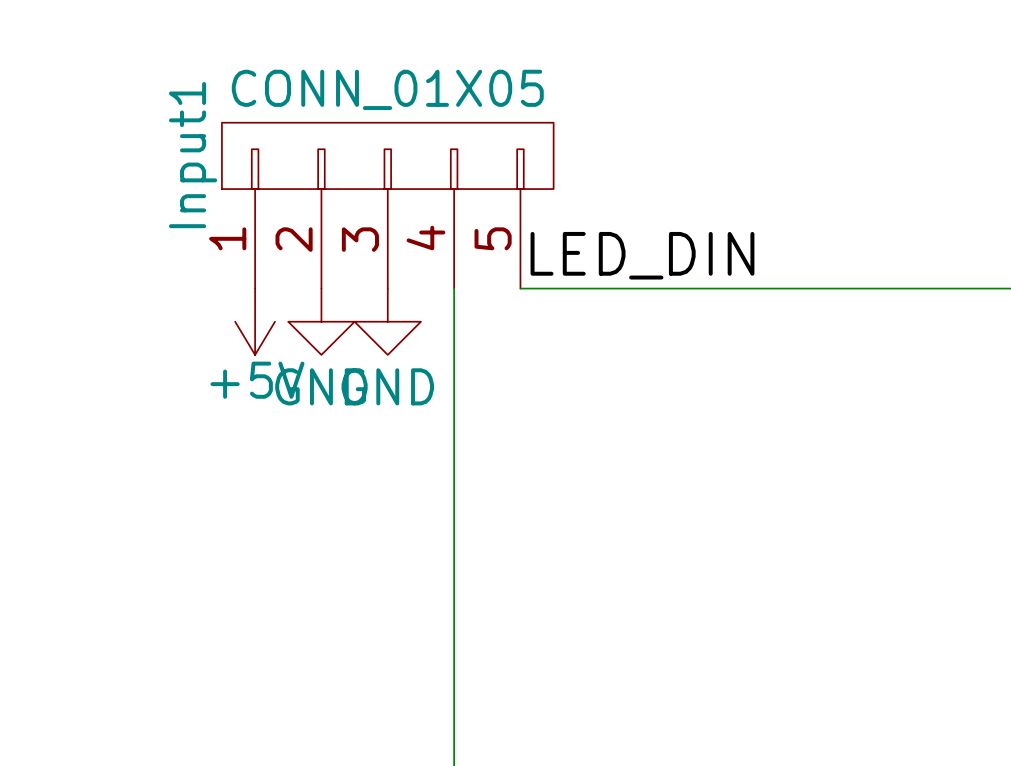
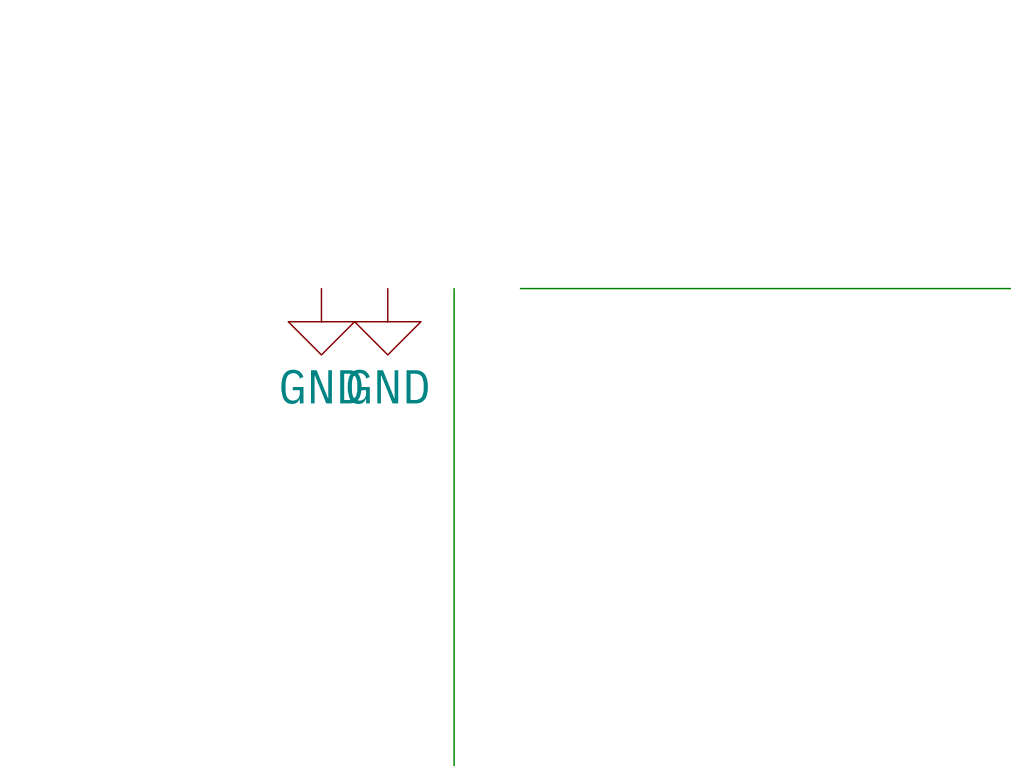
Input1: CONN_01X05 (387, 205) -> none
label: LED_DIN (642, 255) -> none
power symbol: +5V (255, 321) -> none

